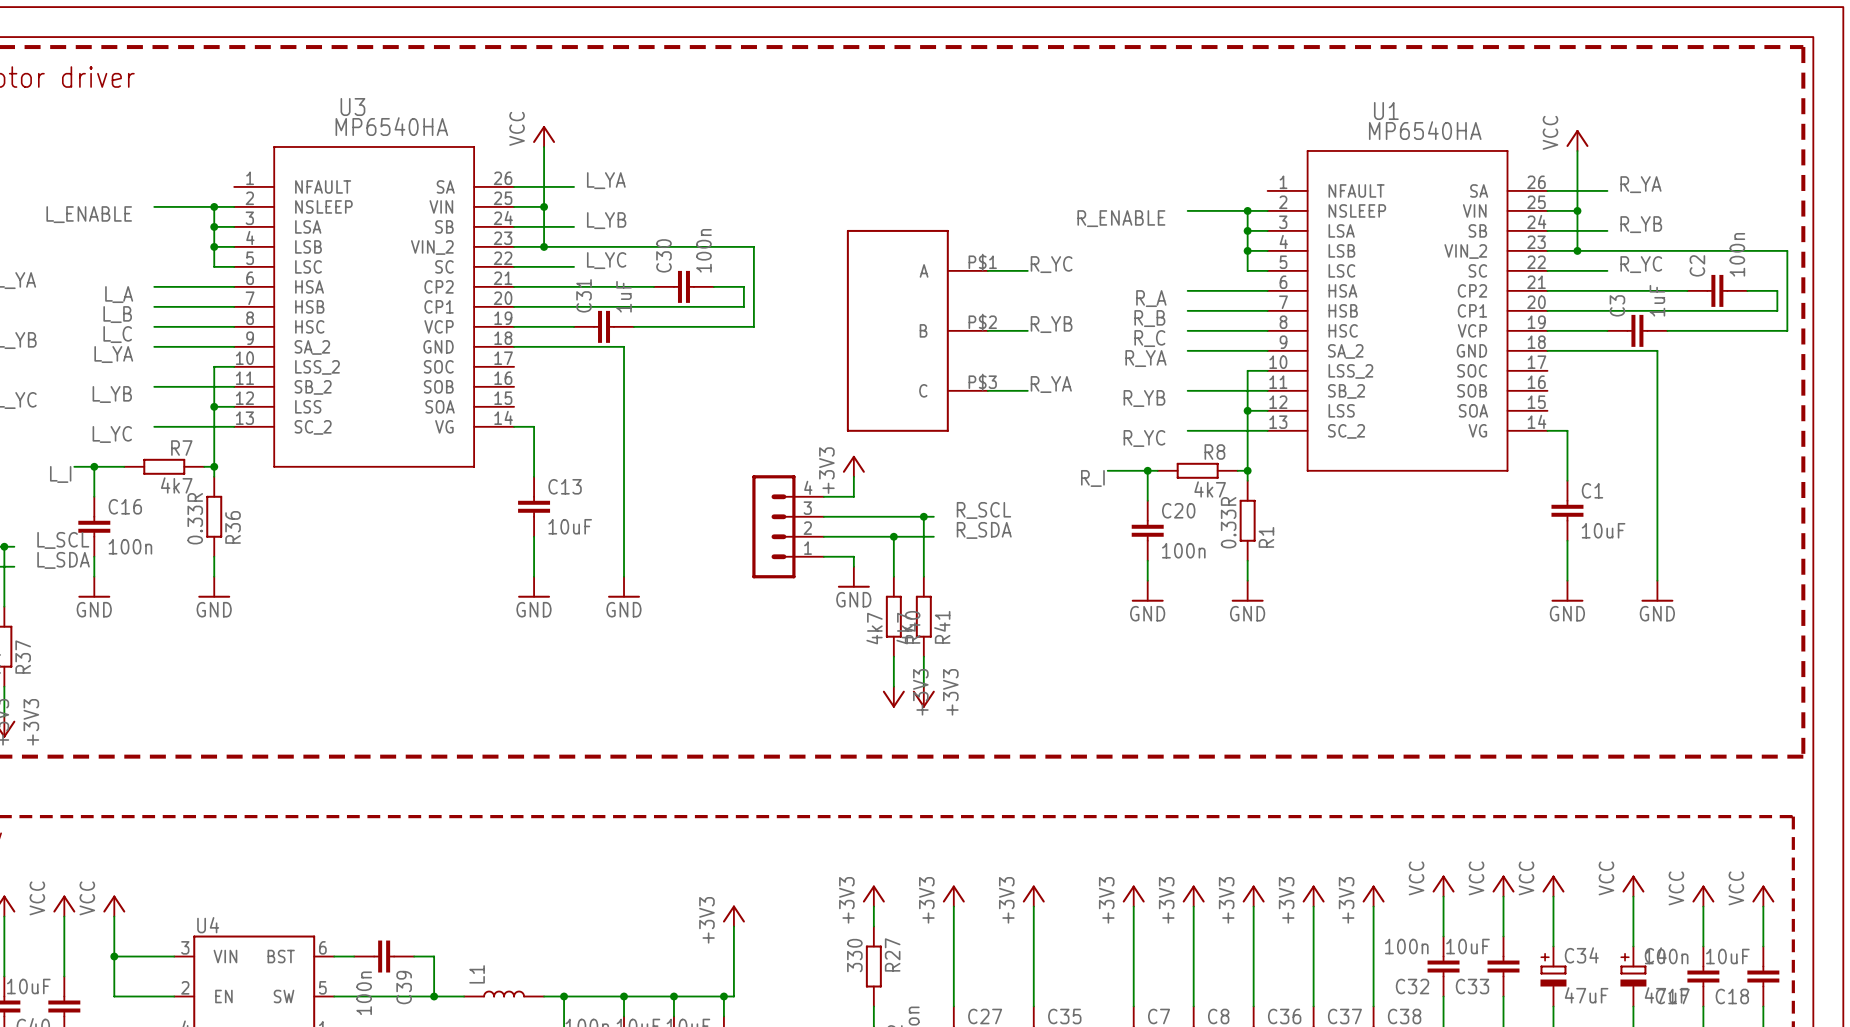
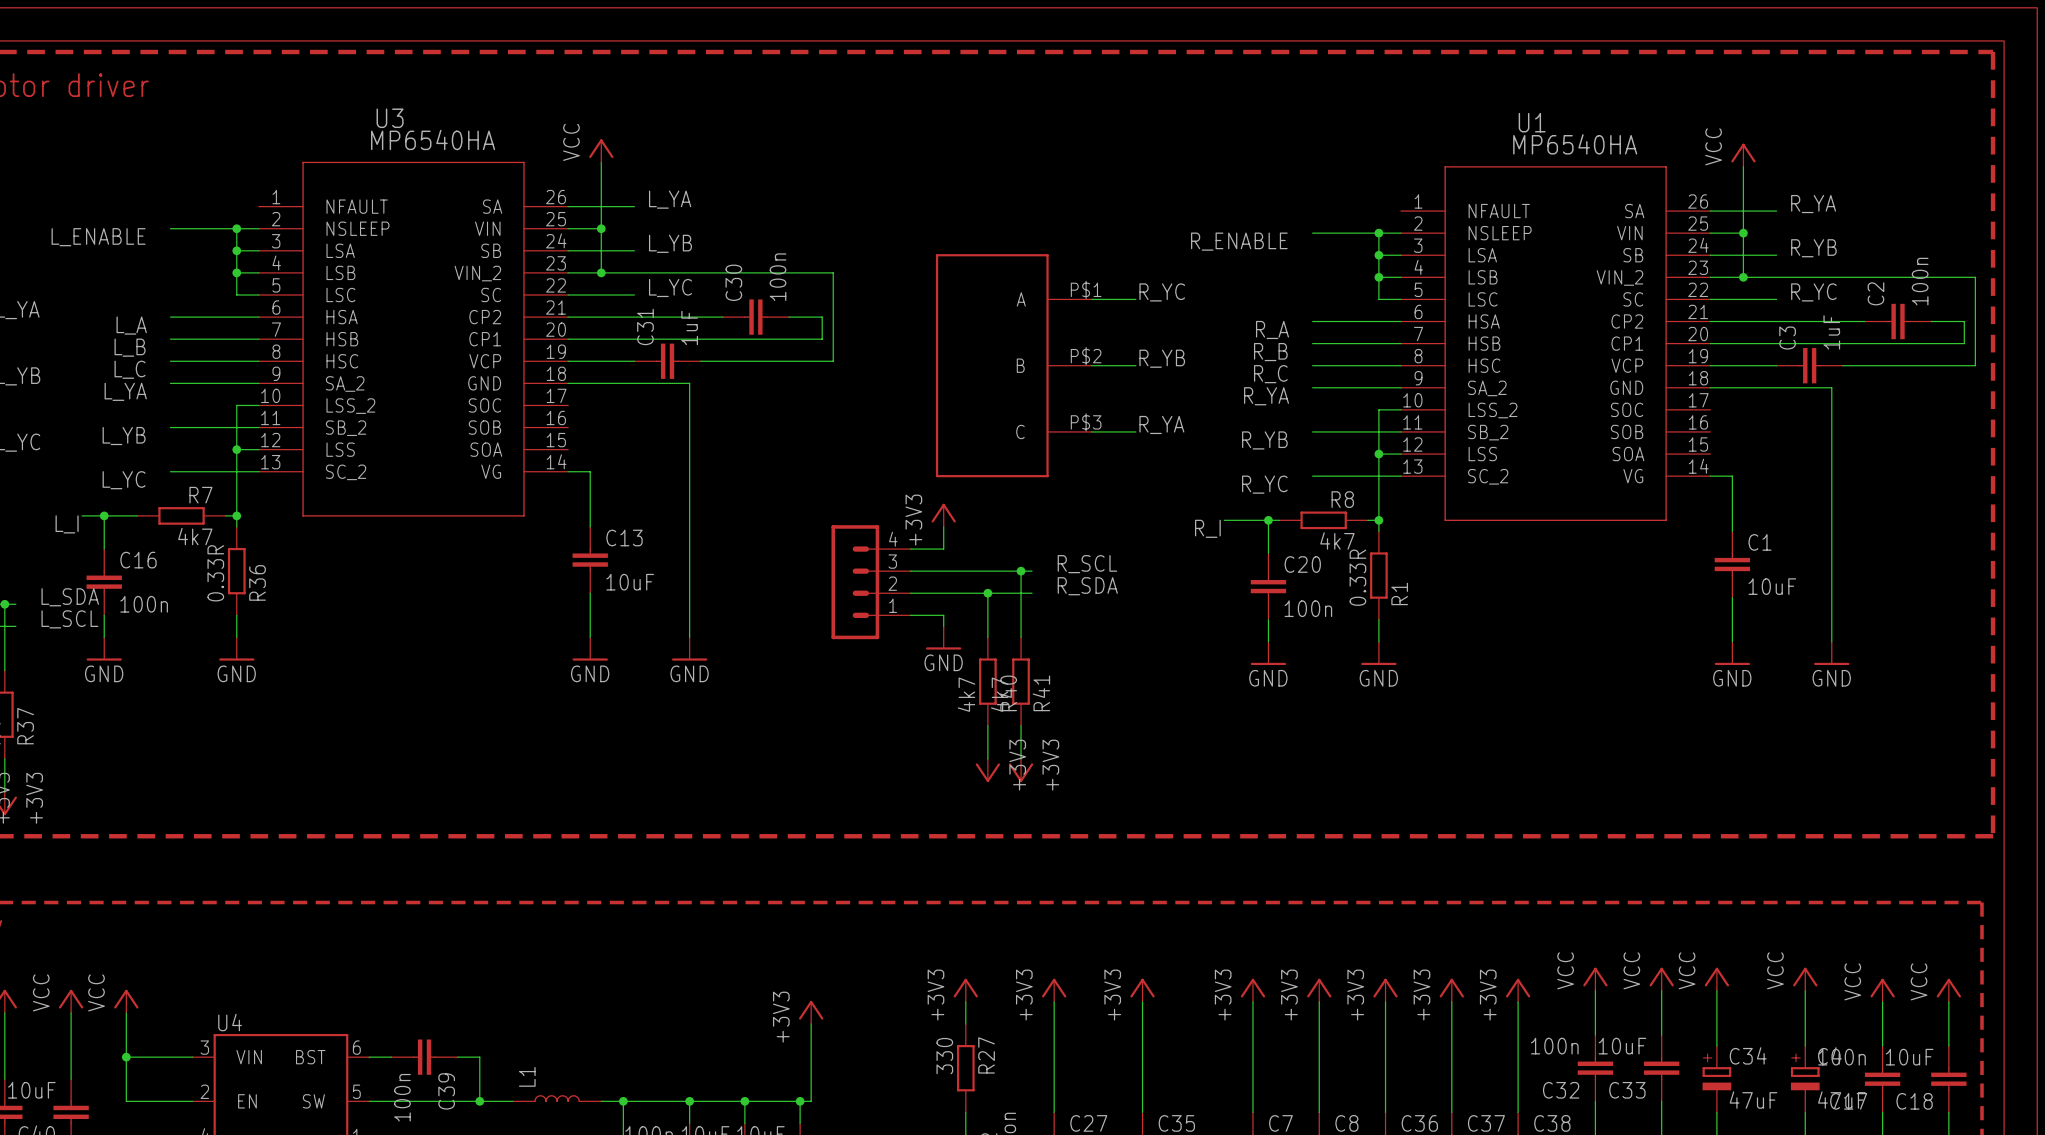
label: L_SCL (63, 540) -> L_SDA (70, 597)
label: L_SDA (63, 560) -> L_SCL (69, 619)

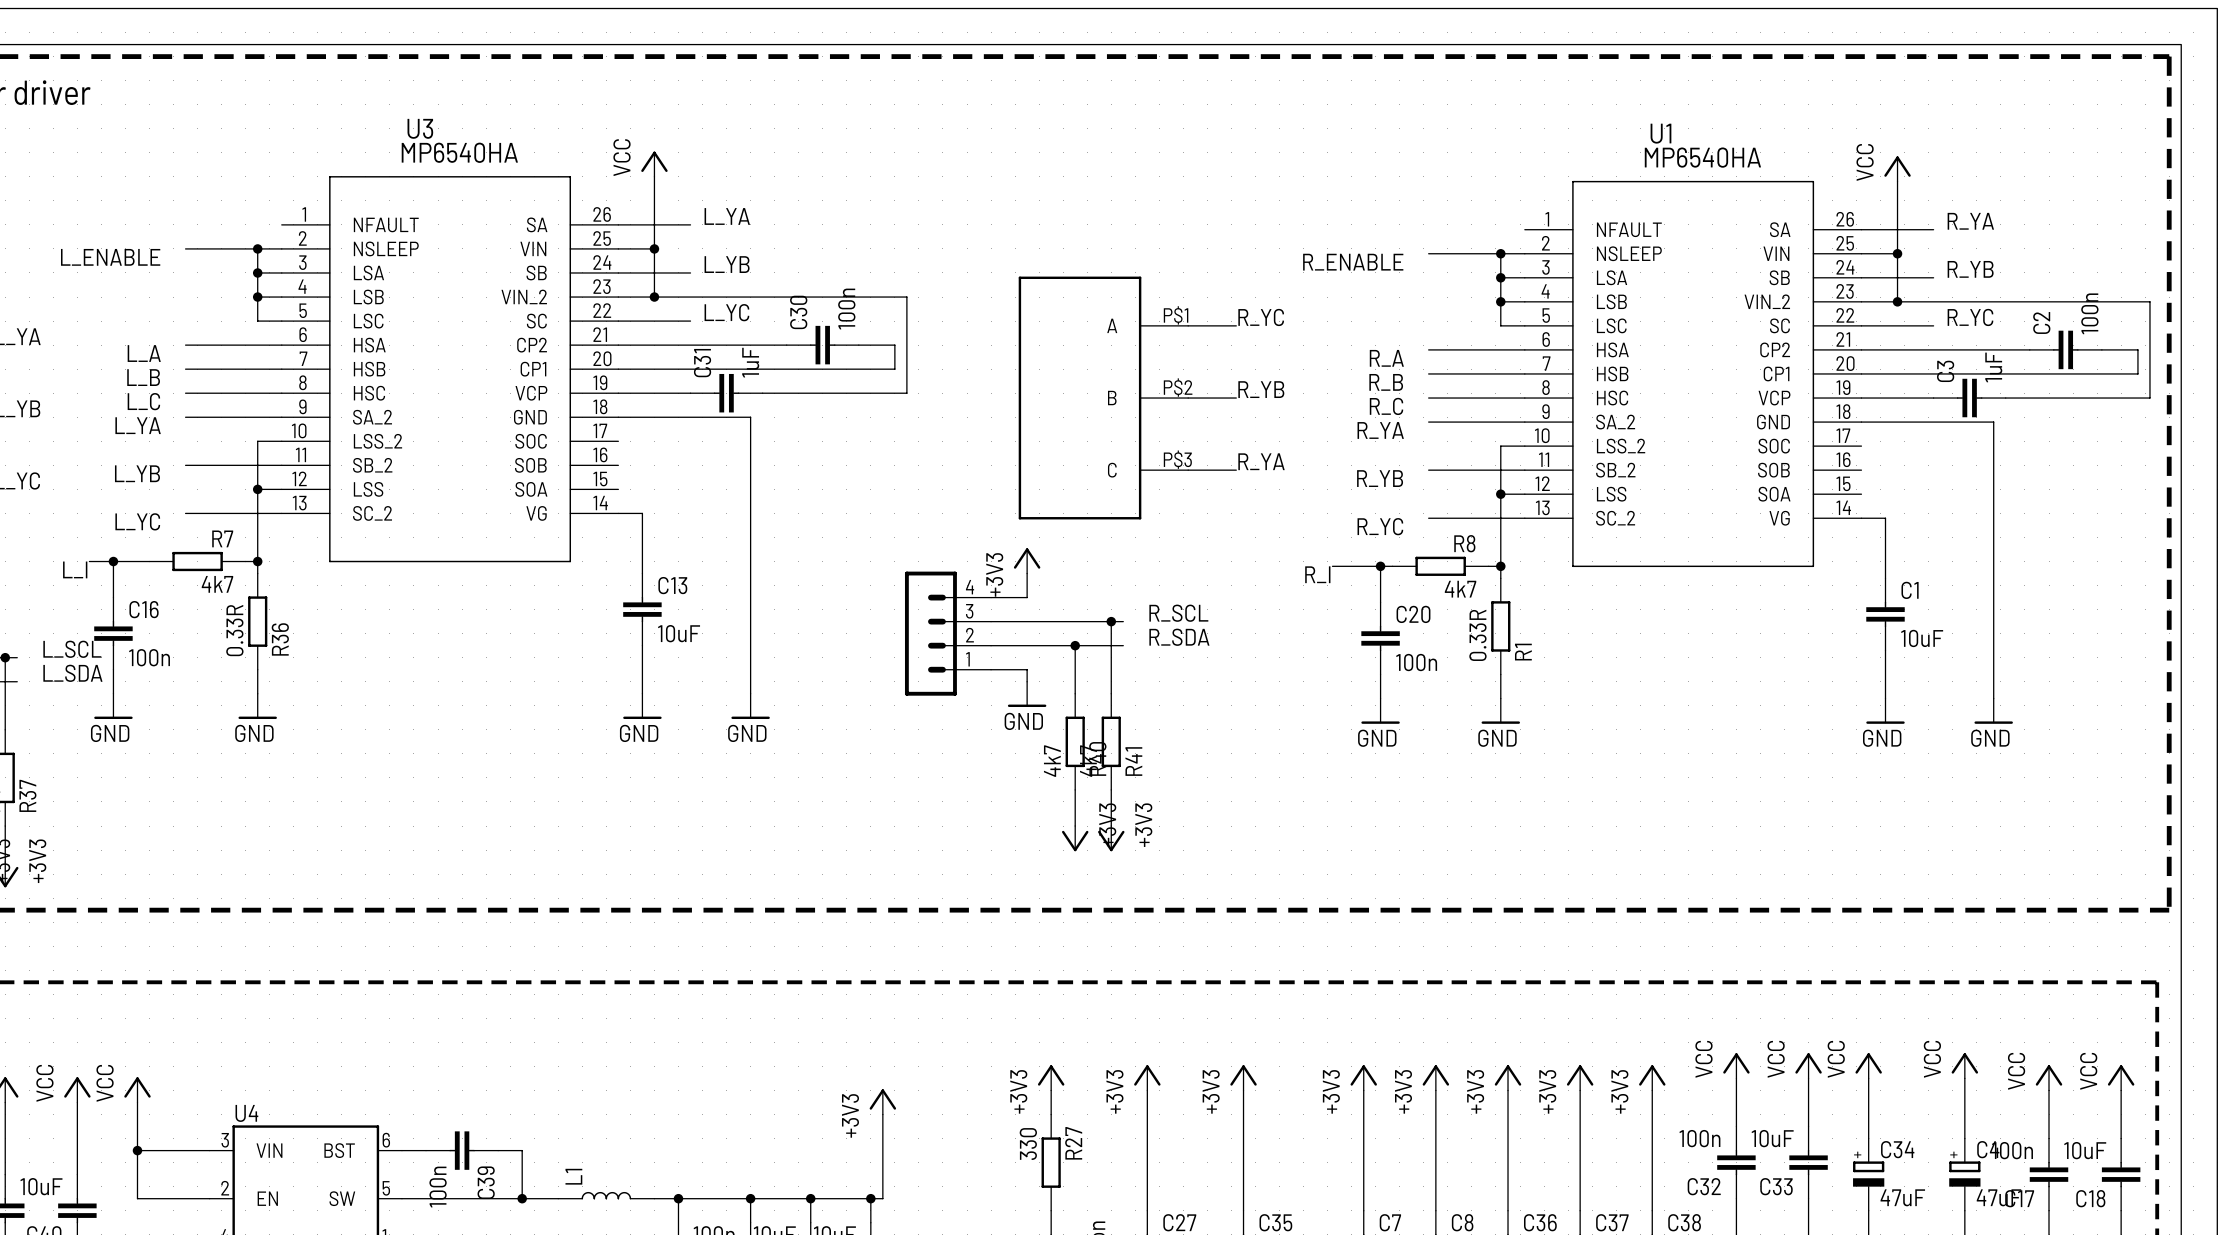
label: L_SDA (70, 597) -> L_SCL (72, 649)
label: L_SCL (69, 619) -> L_SDA (72, 673)

